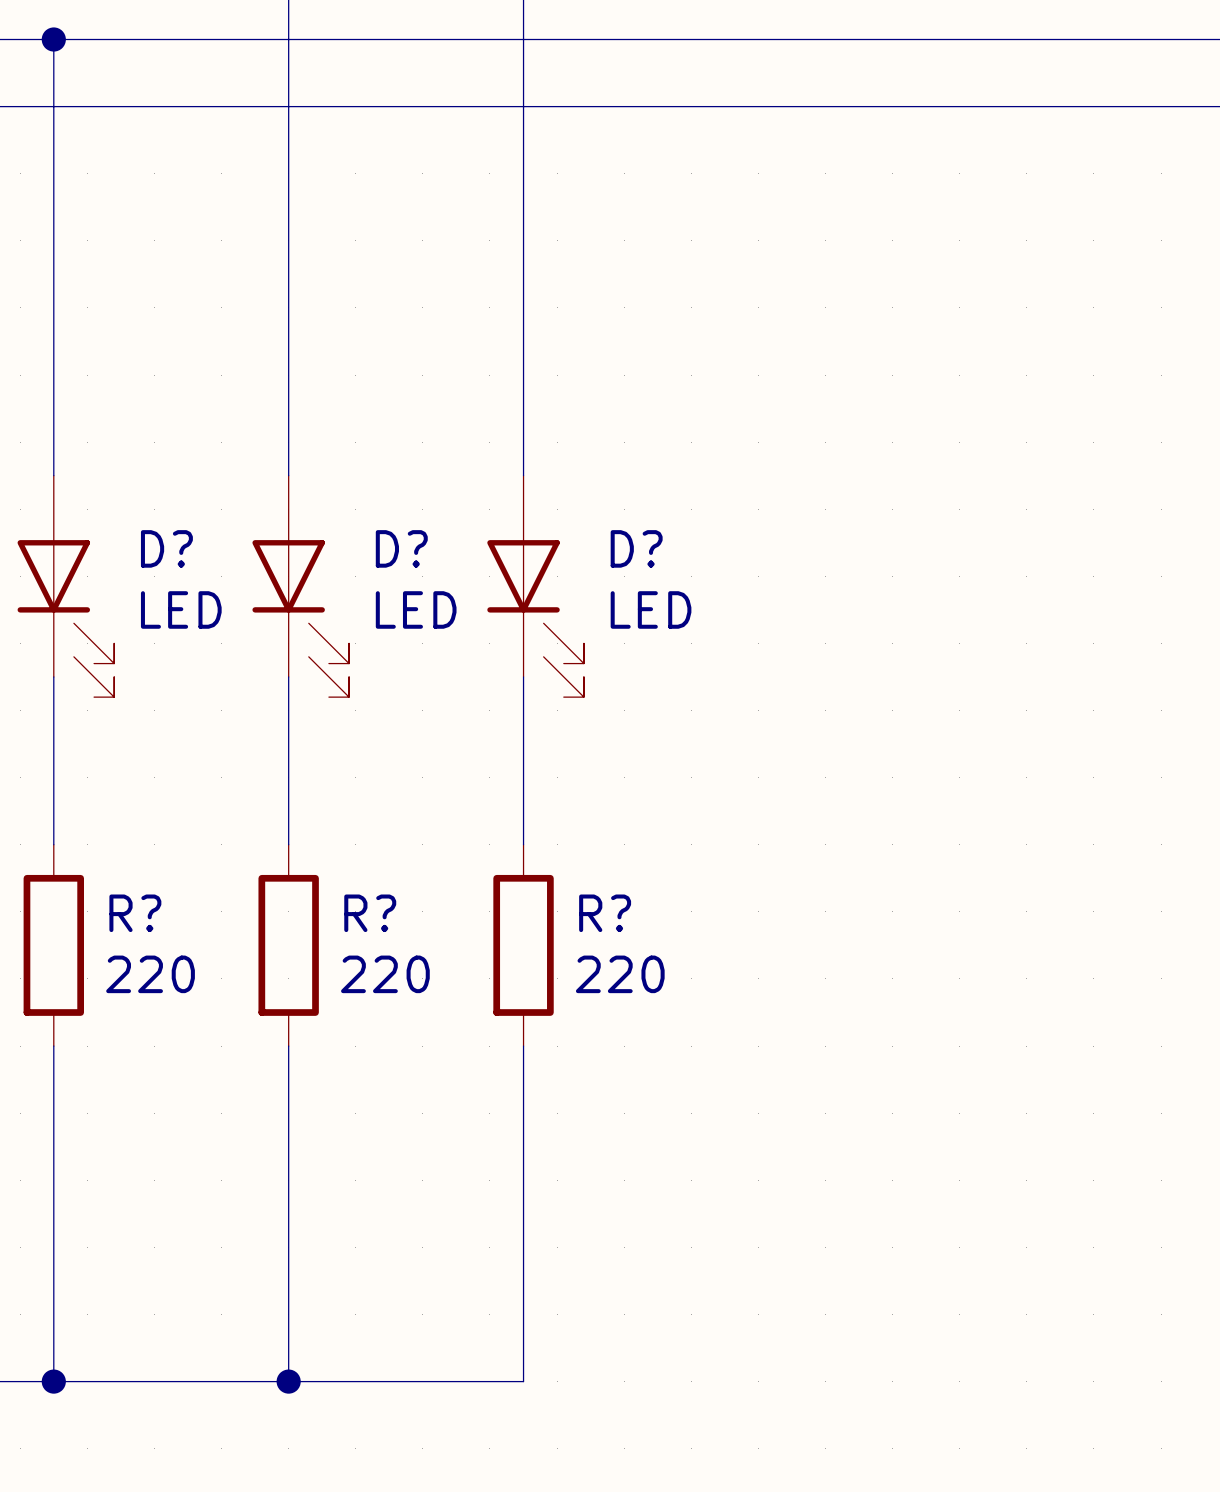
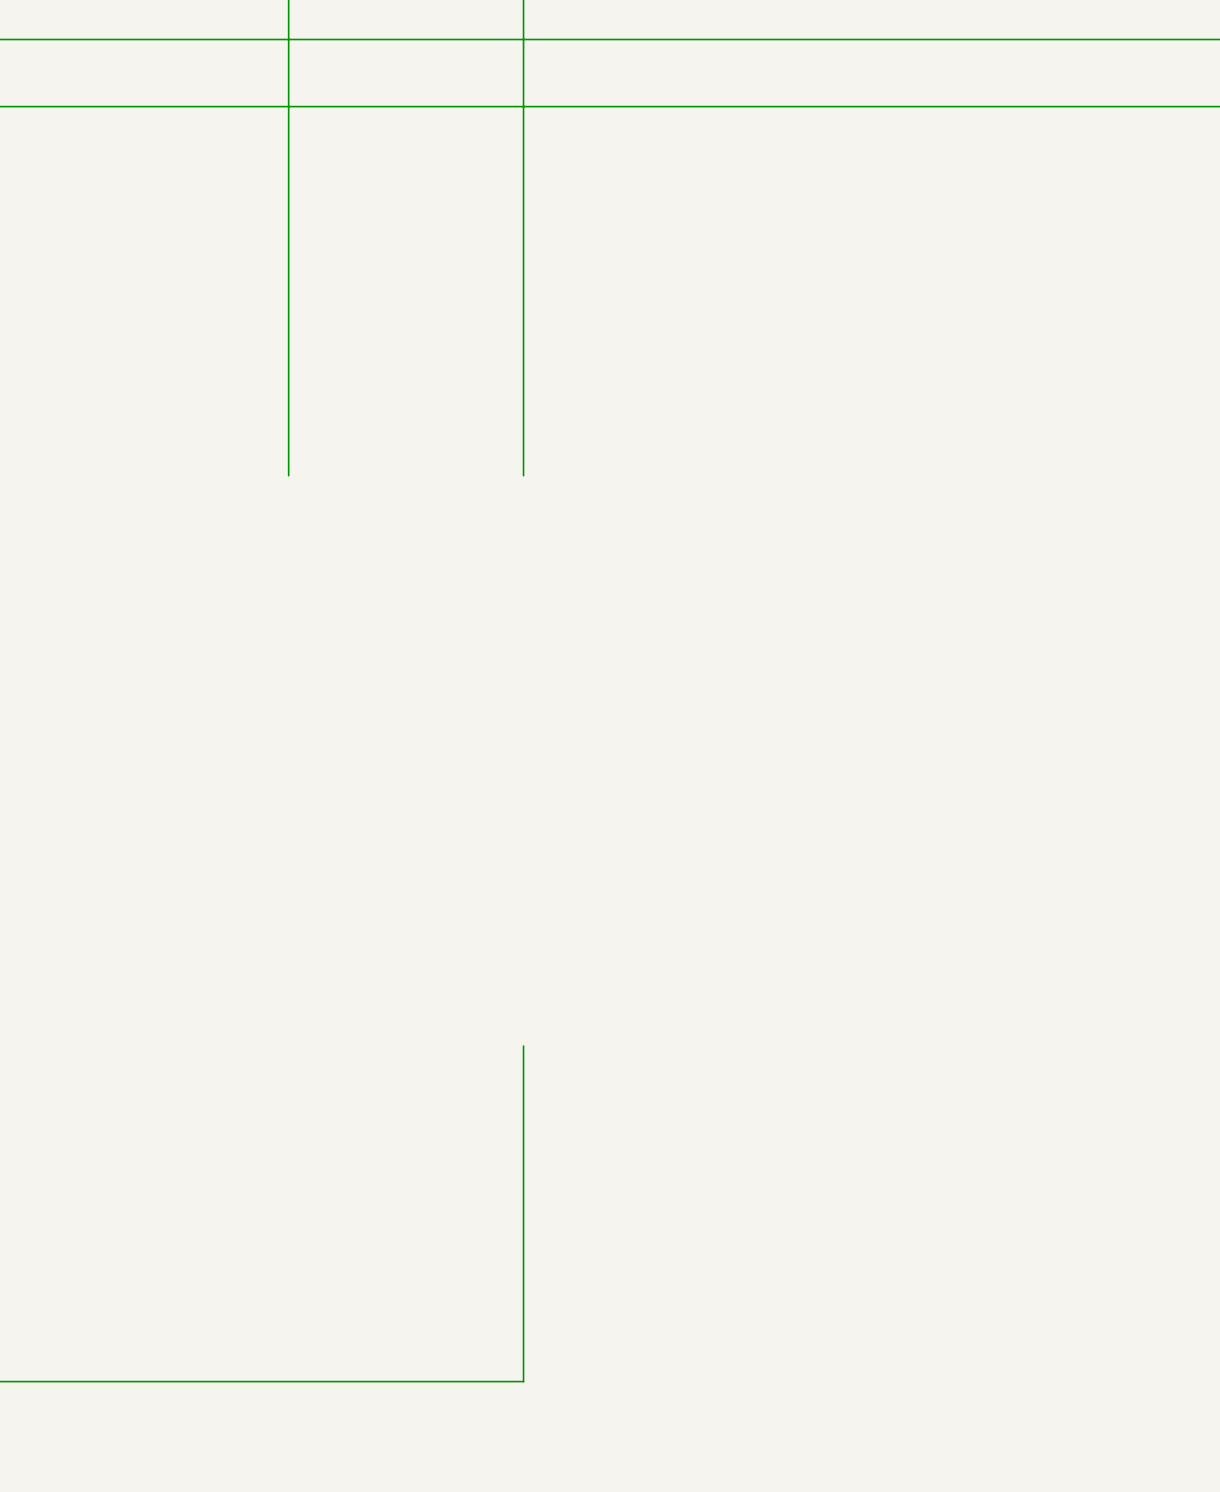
wire: (53, 39) (53, 475) -> none
junction: (53, 39) -> none
D?: LED (65, 586) -> none
D?: LED (300, 586) -> none
D?: LED (535, 586) -> none
wire: (53, 676) (53, 844) -> none
wire: (288, 676) (288, 844) -> none
wire: (523, 676) (523, 844) -> none
R?: 220 (53, 945) -> none
R?: 220 (288, 945) -> none
R?: 220 (523, 945) -> none
wire: (53, 1046) (53, 1381) -> none
wire: (288, 1046) (288, 1381) -> none
junction: (53, 1381) -> none
junction: (288, 1381) -> none

